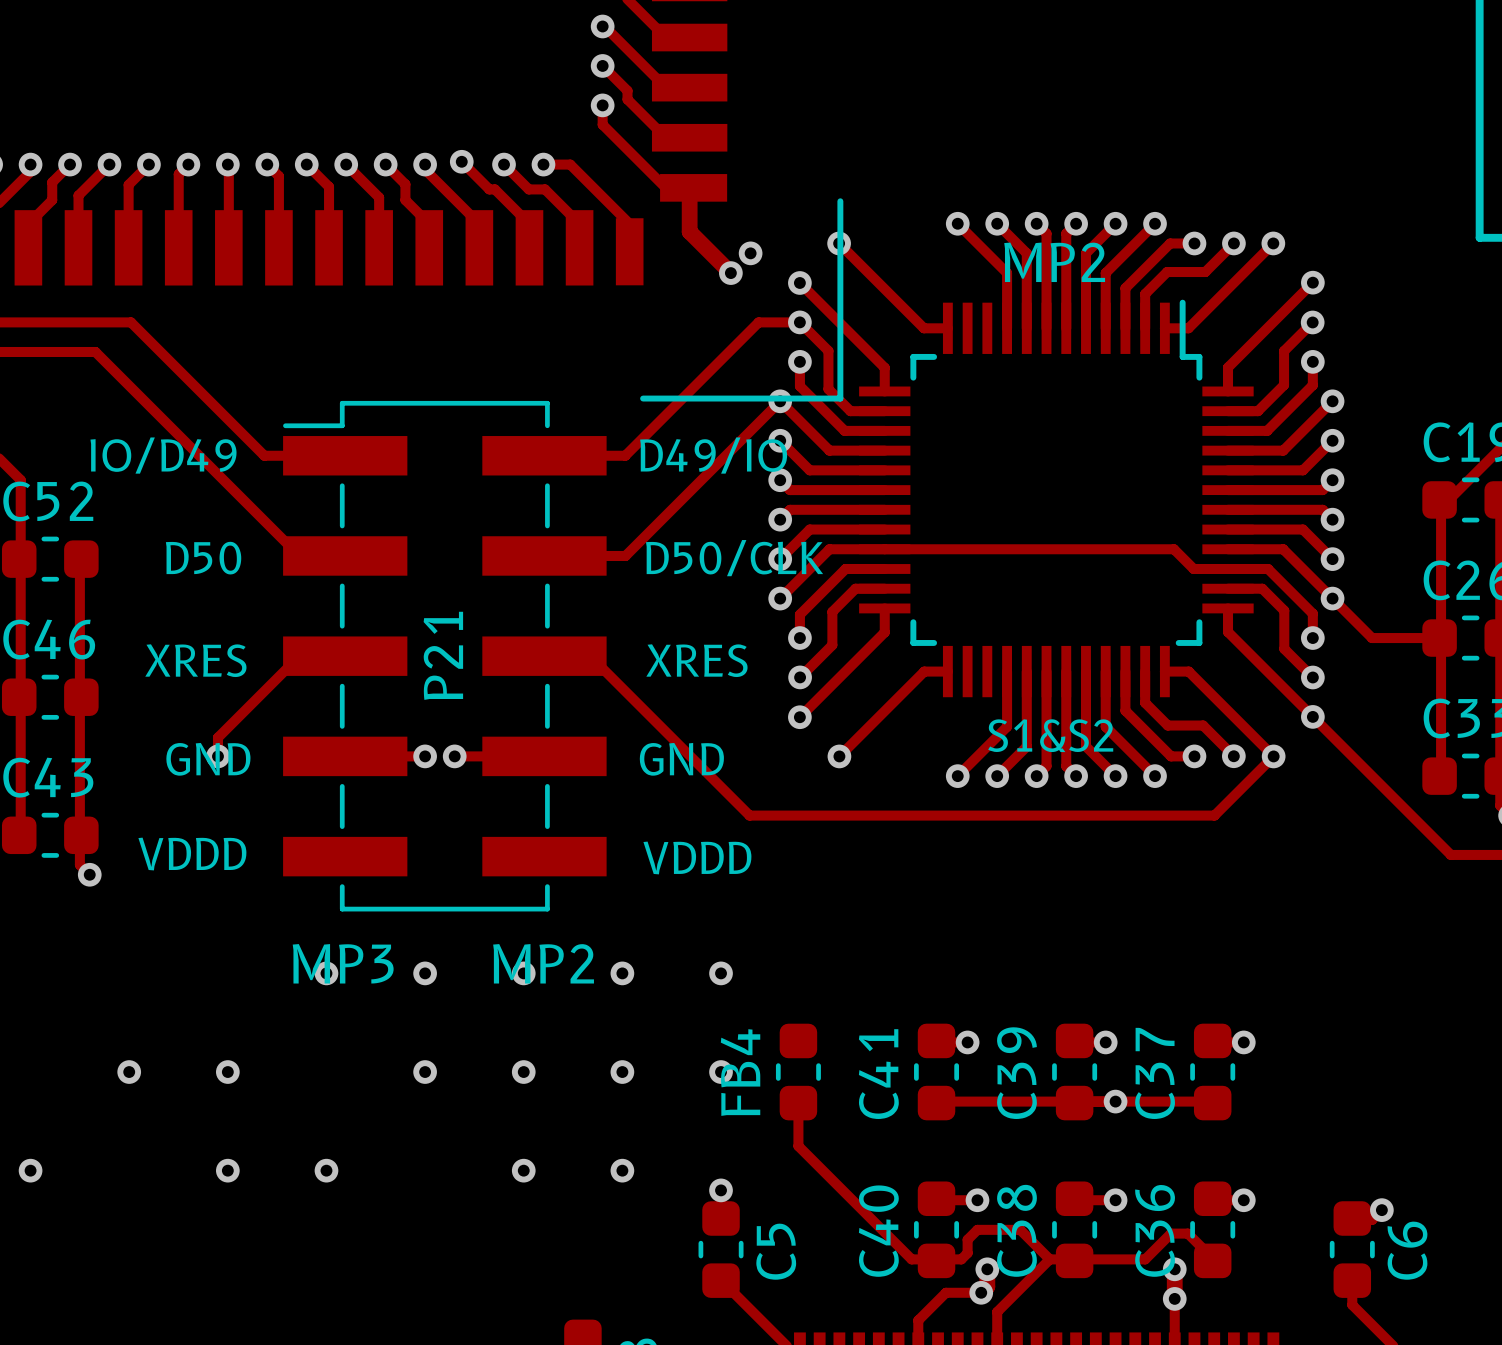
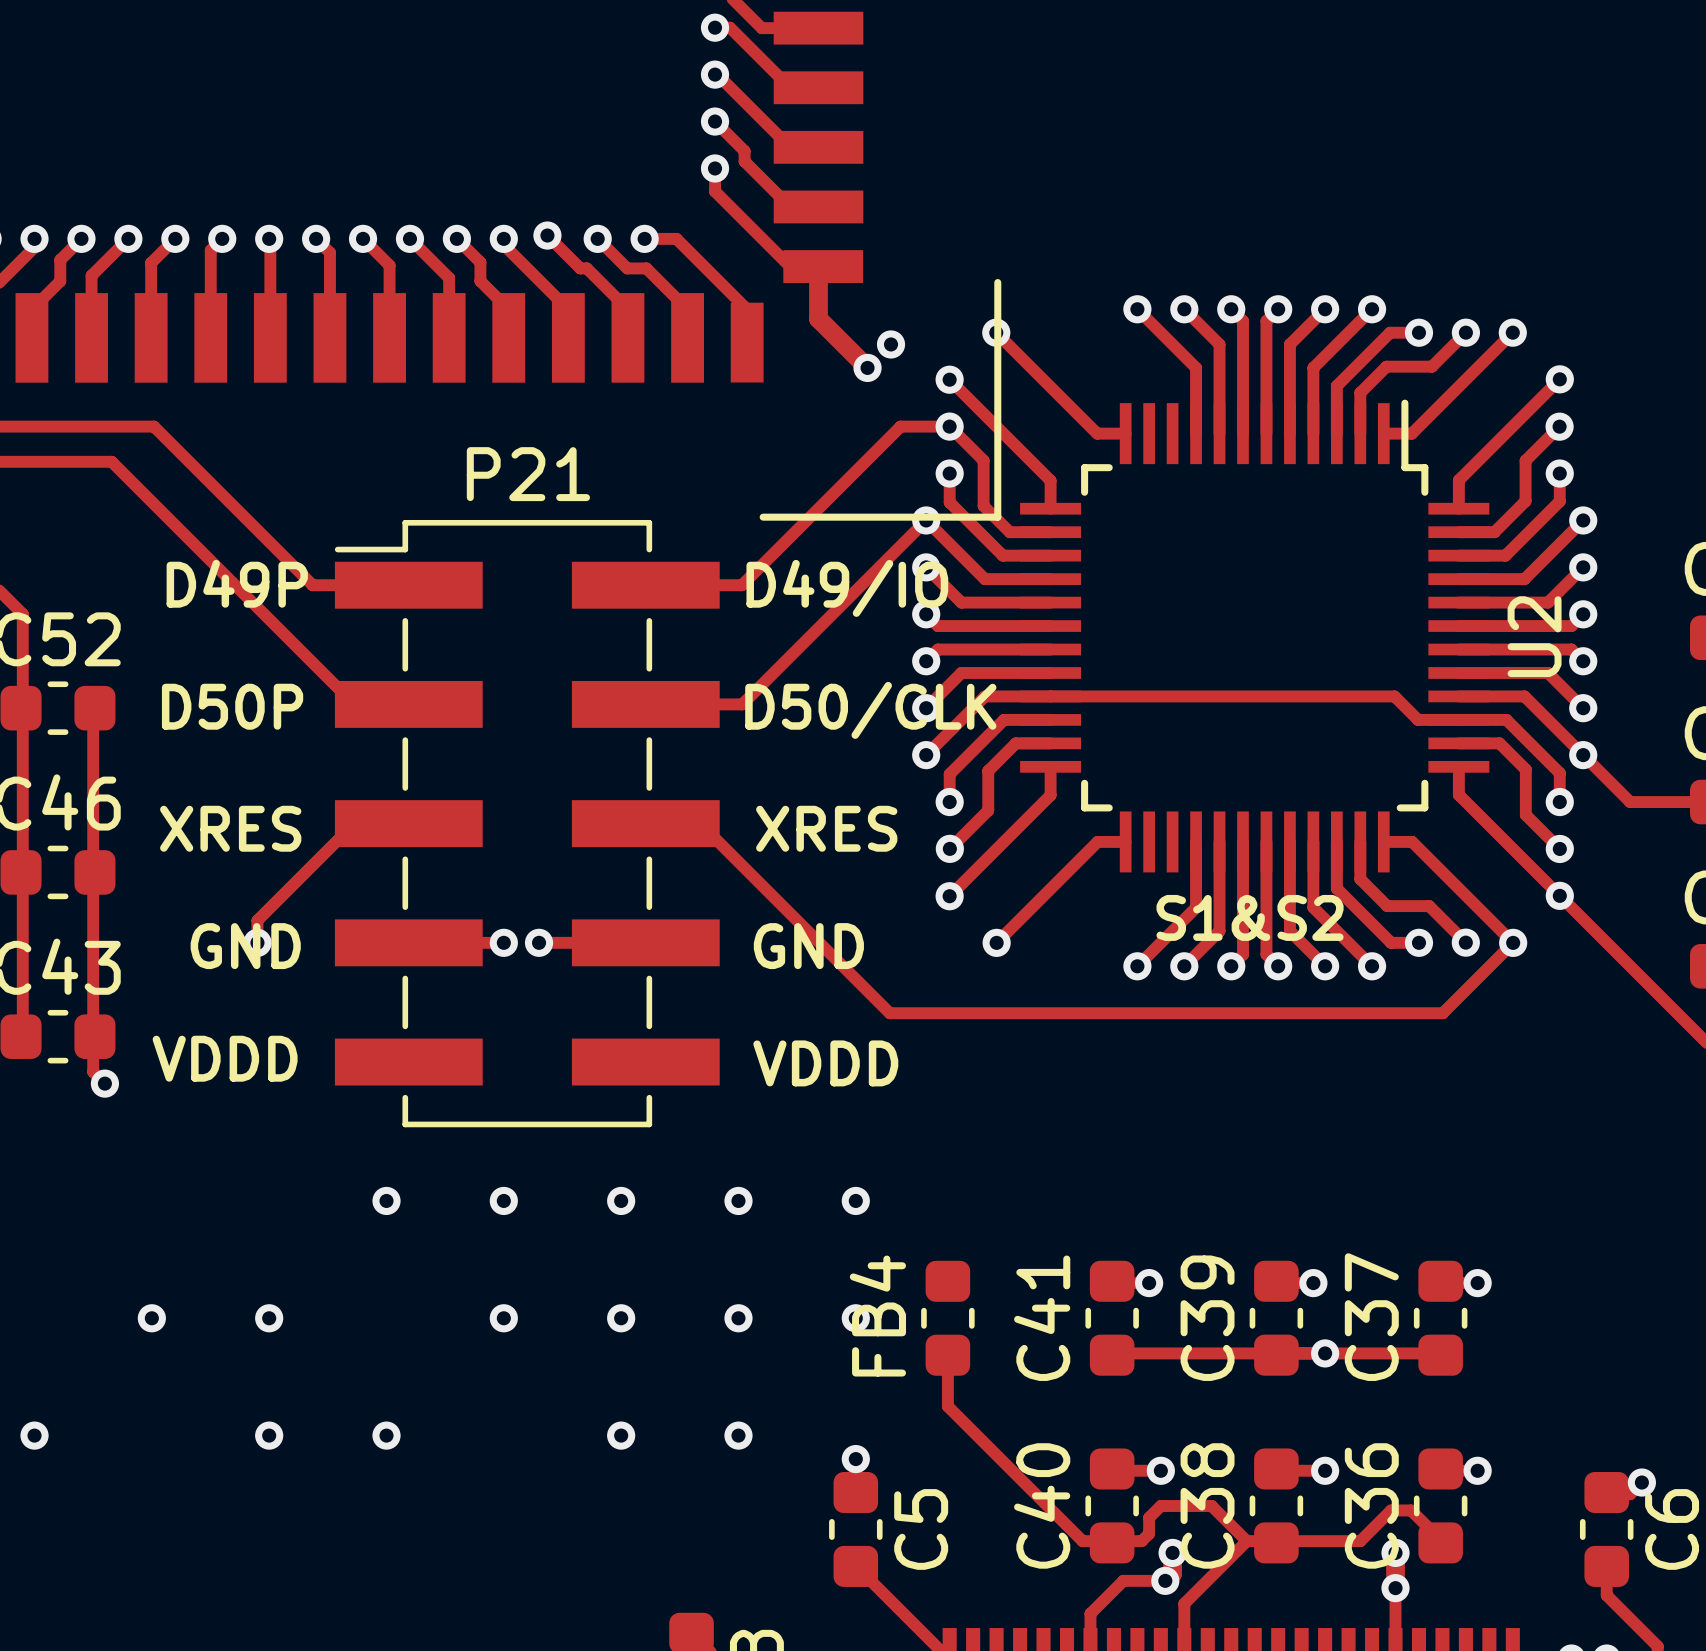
MP2 name: MP2 (1054, 262) -> U2 (1534, 636)
text: IO/D49 (163, 455) -> D49P (237, 583)
text: D50 (203, 558) -> D50P (232, 706)
P21 name rotation: 0° (443, 655) -> 90° clockwise (528, 474)
P21 name position: P21 (443, 655) -> P21 (528, 474)
text: MP3 (343, 963) -> none
text: MP2 (543, 963) -> none

